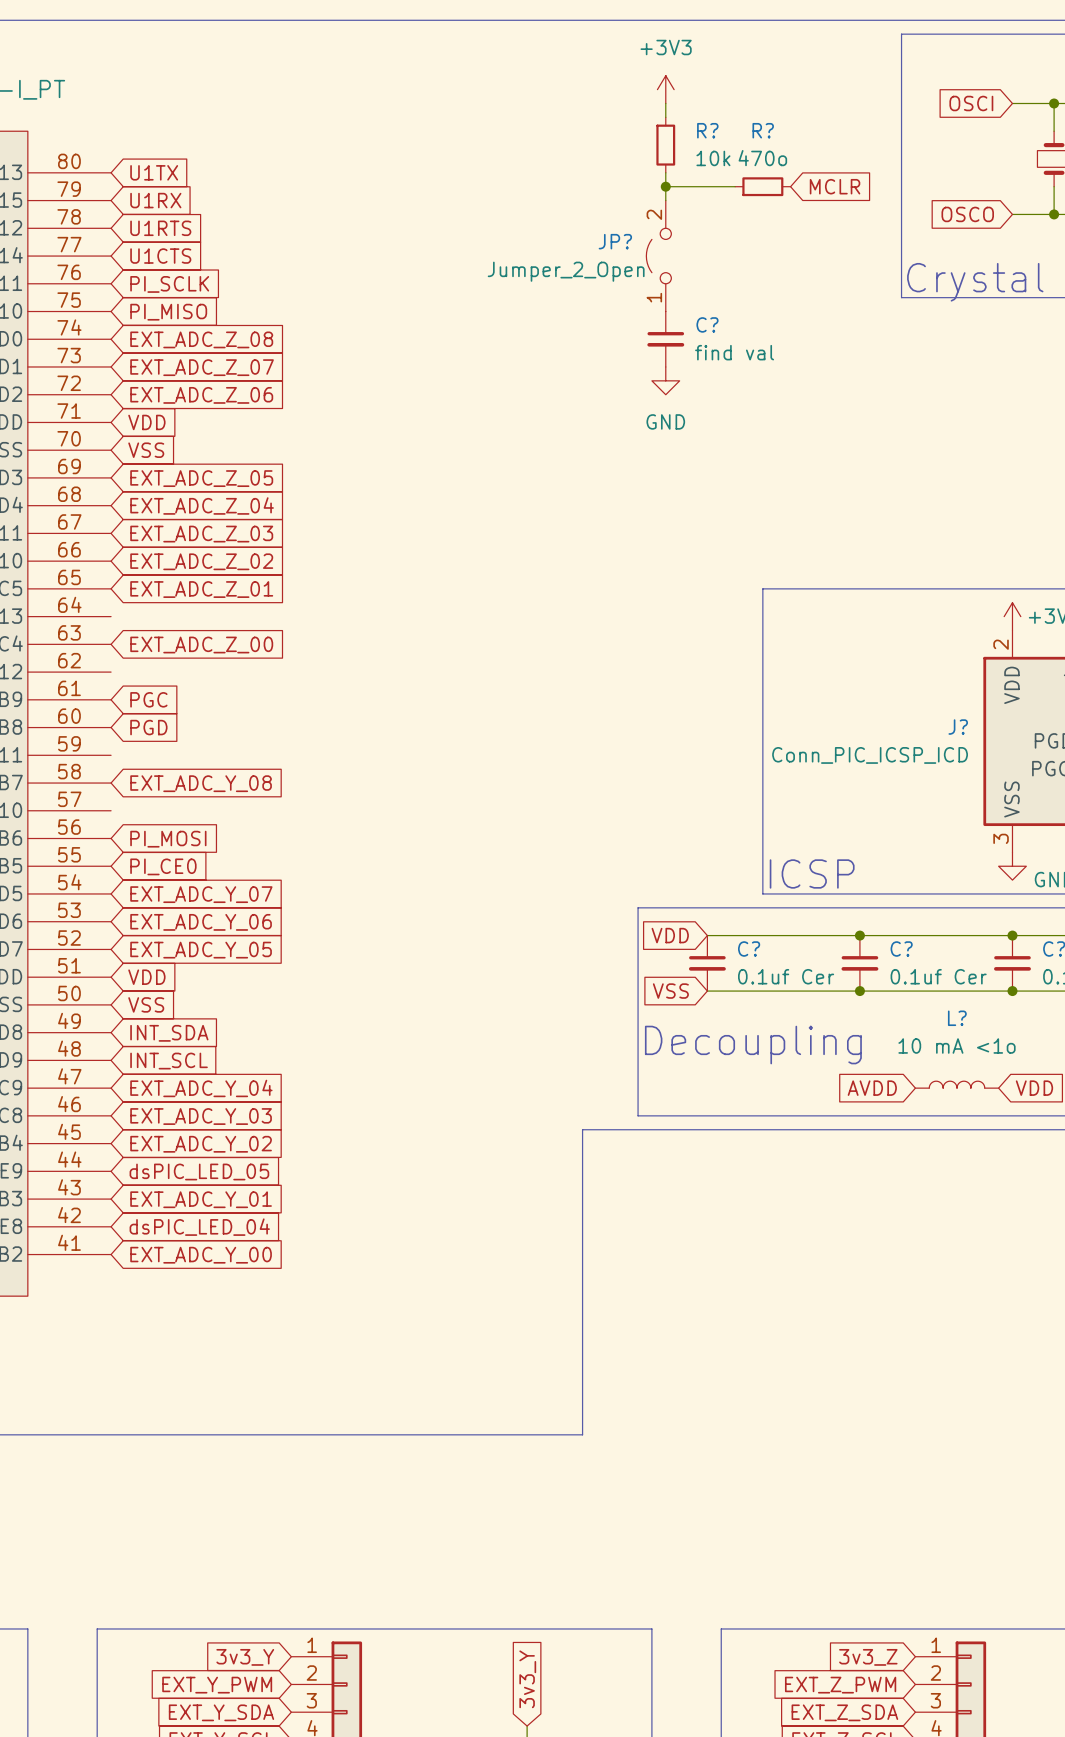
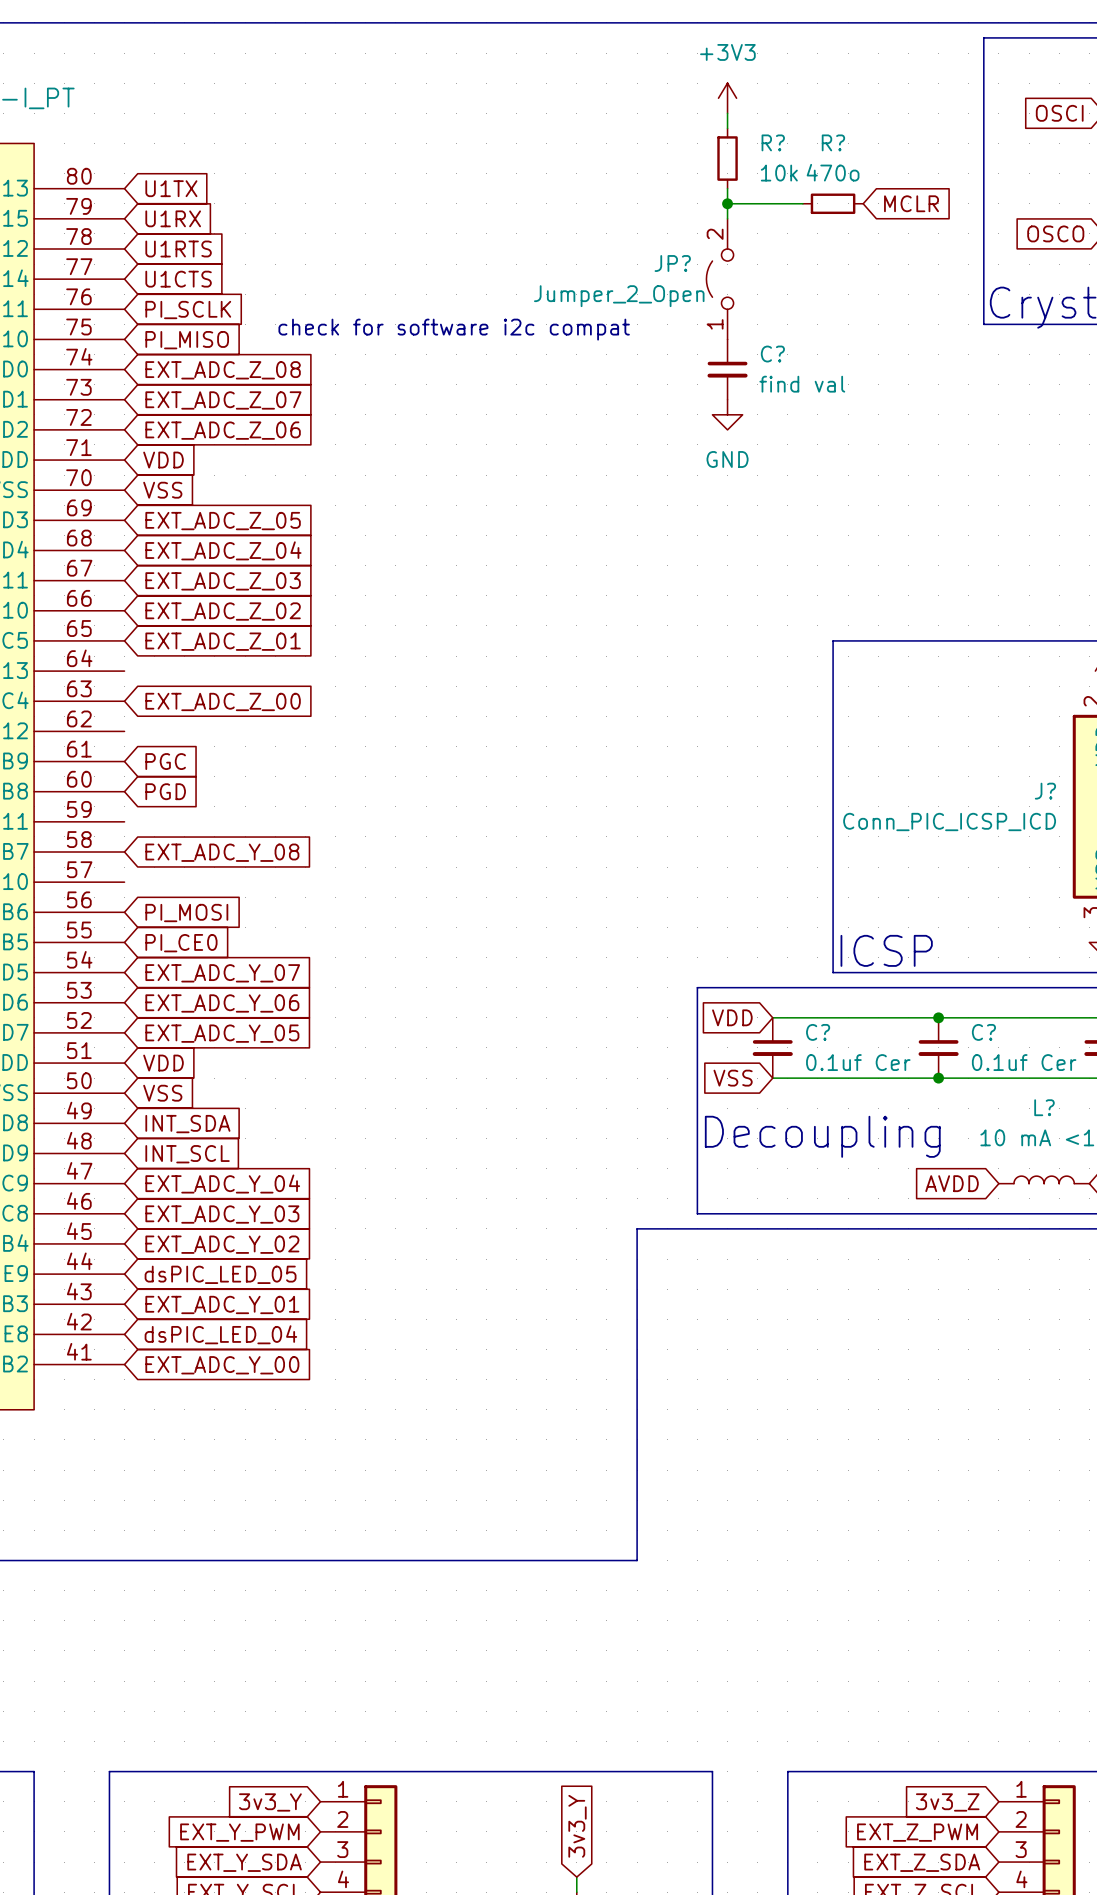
text: none -> check for software i2c compat (454, 329)

